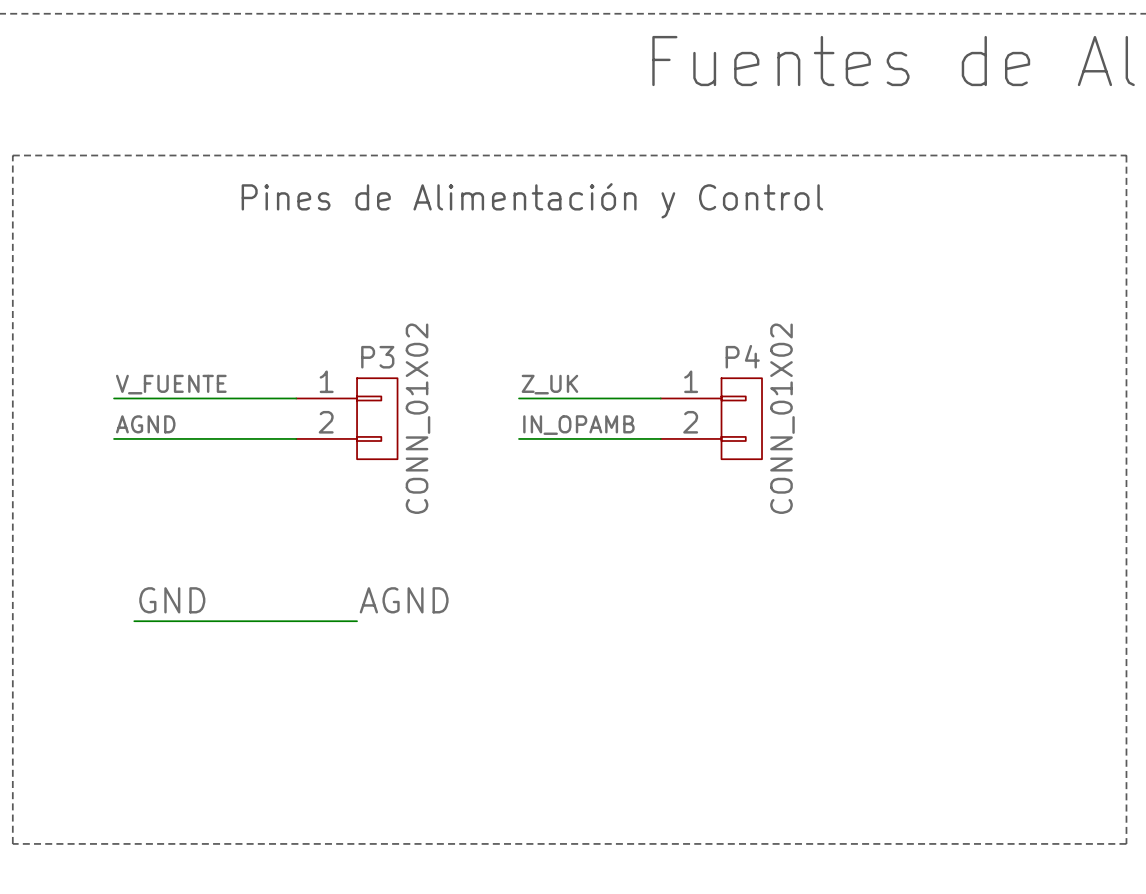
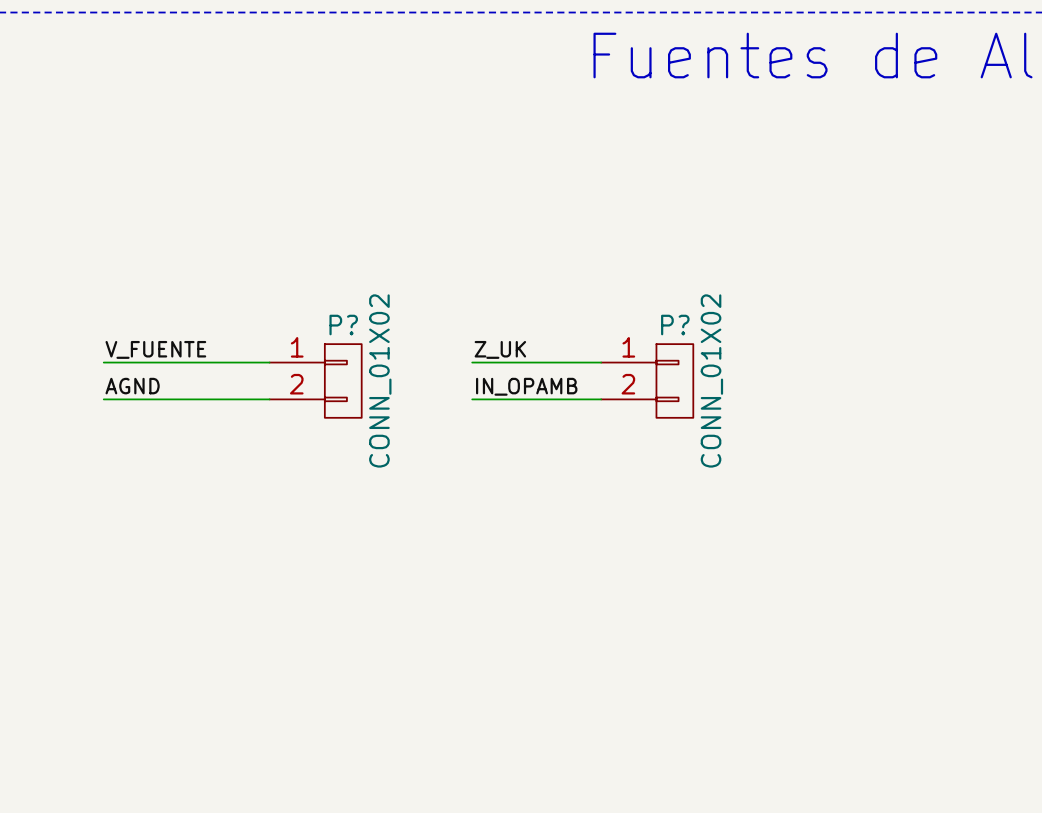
line: (12, 155) (12, 843) (1126, 843) (1126, 155) (12, 155) -> none
text: Pines de Alimentación y Control (532, 200) -> none
P4 name: P4 (742, 356) -> P? (675, 325)
P3 name: P3 (377, 357) -> P? (343, 325)
label: GND (172, 600) -> none
label: AGND (404, 600) -> none
wire: (134, 621) (357, 621) -> none

